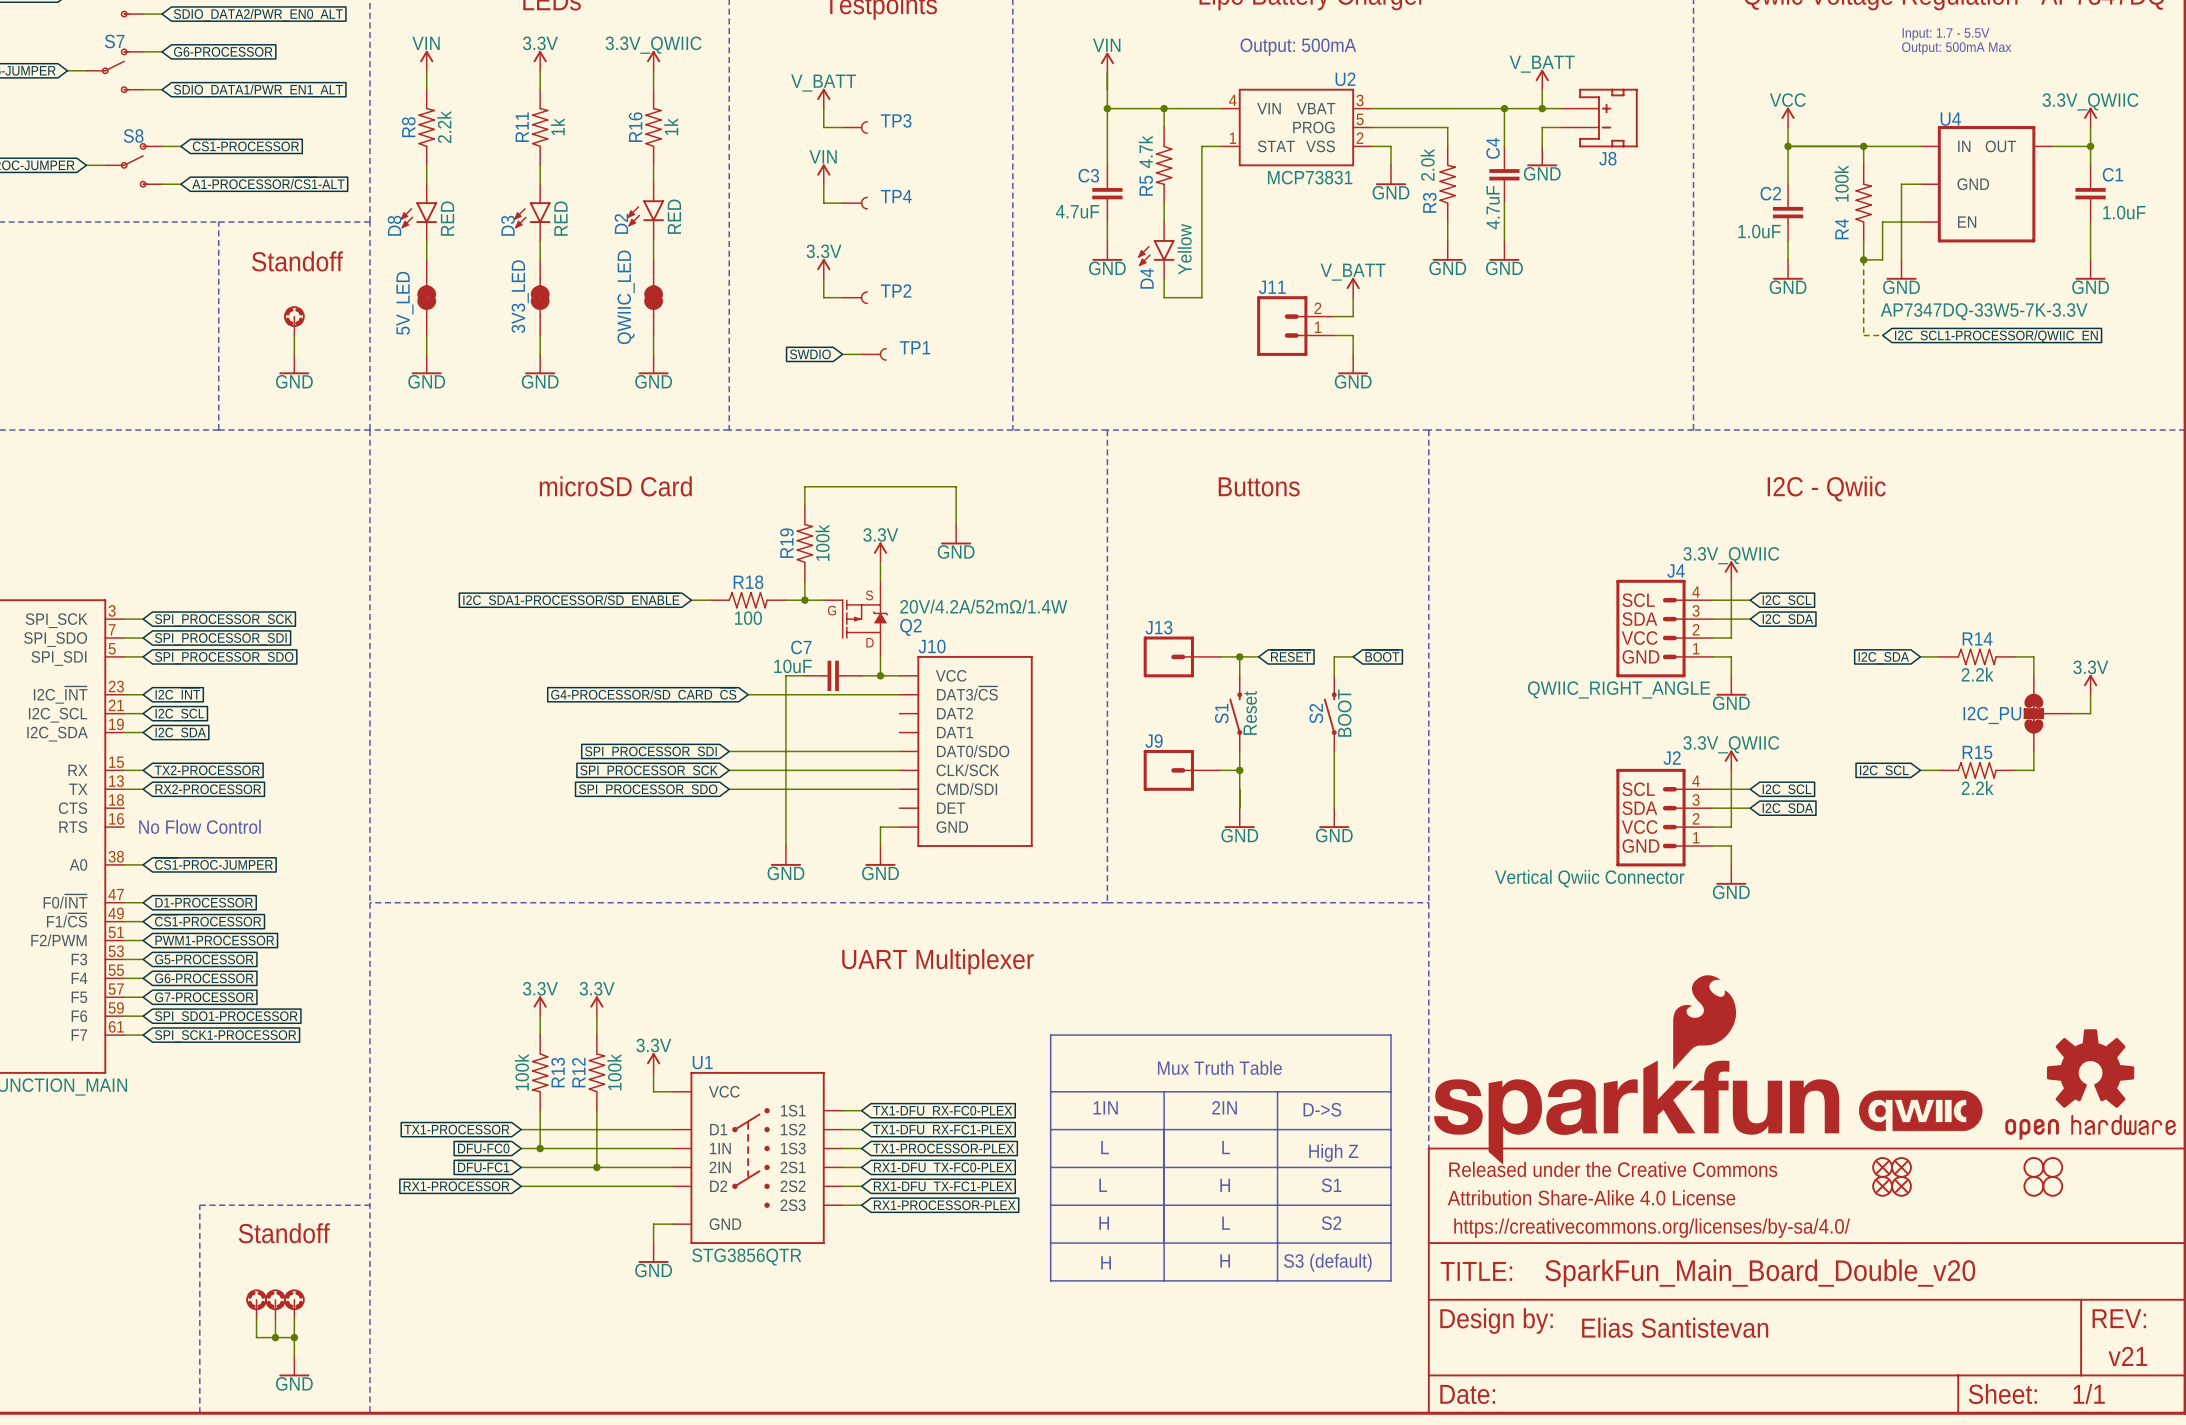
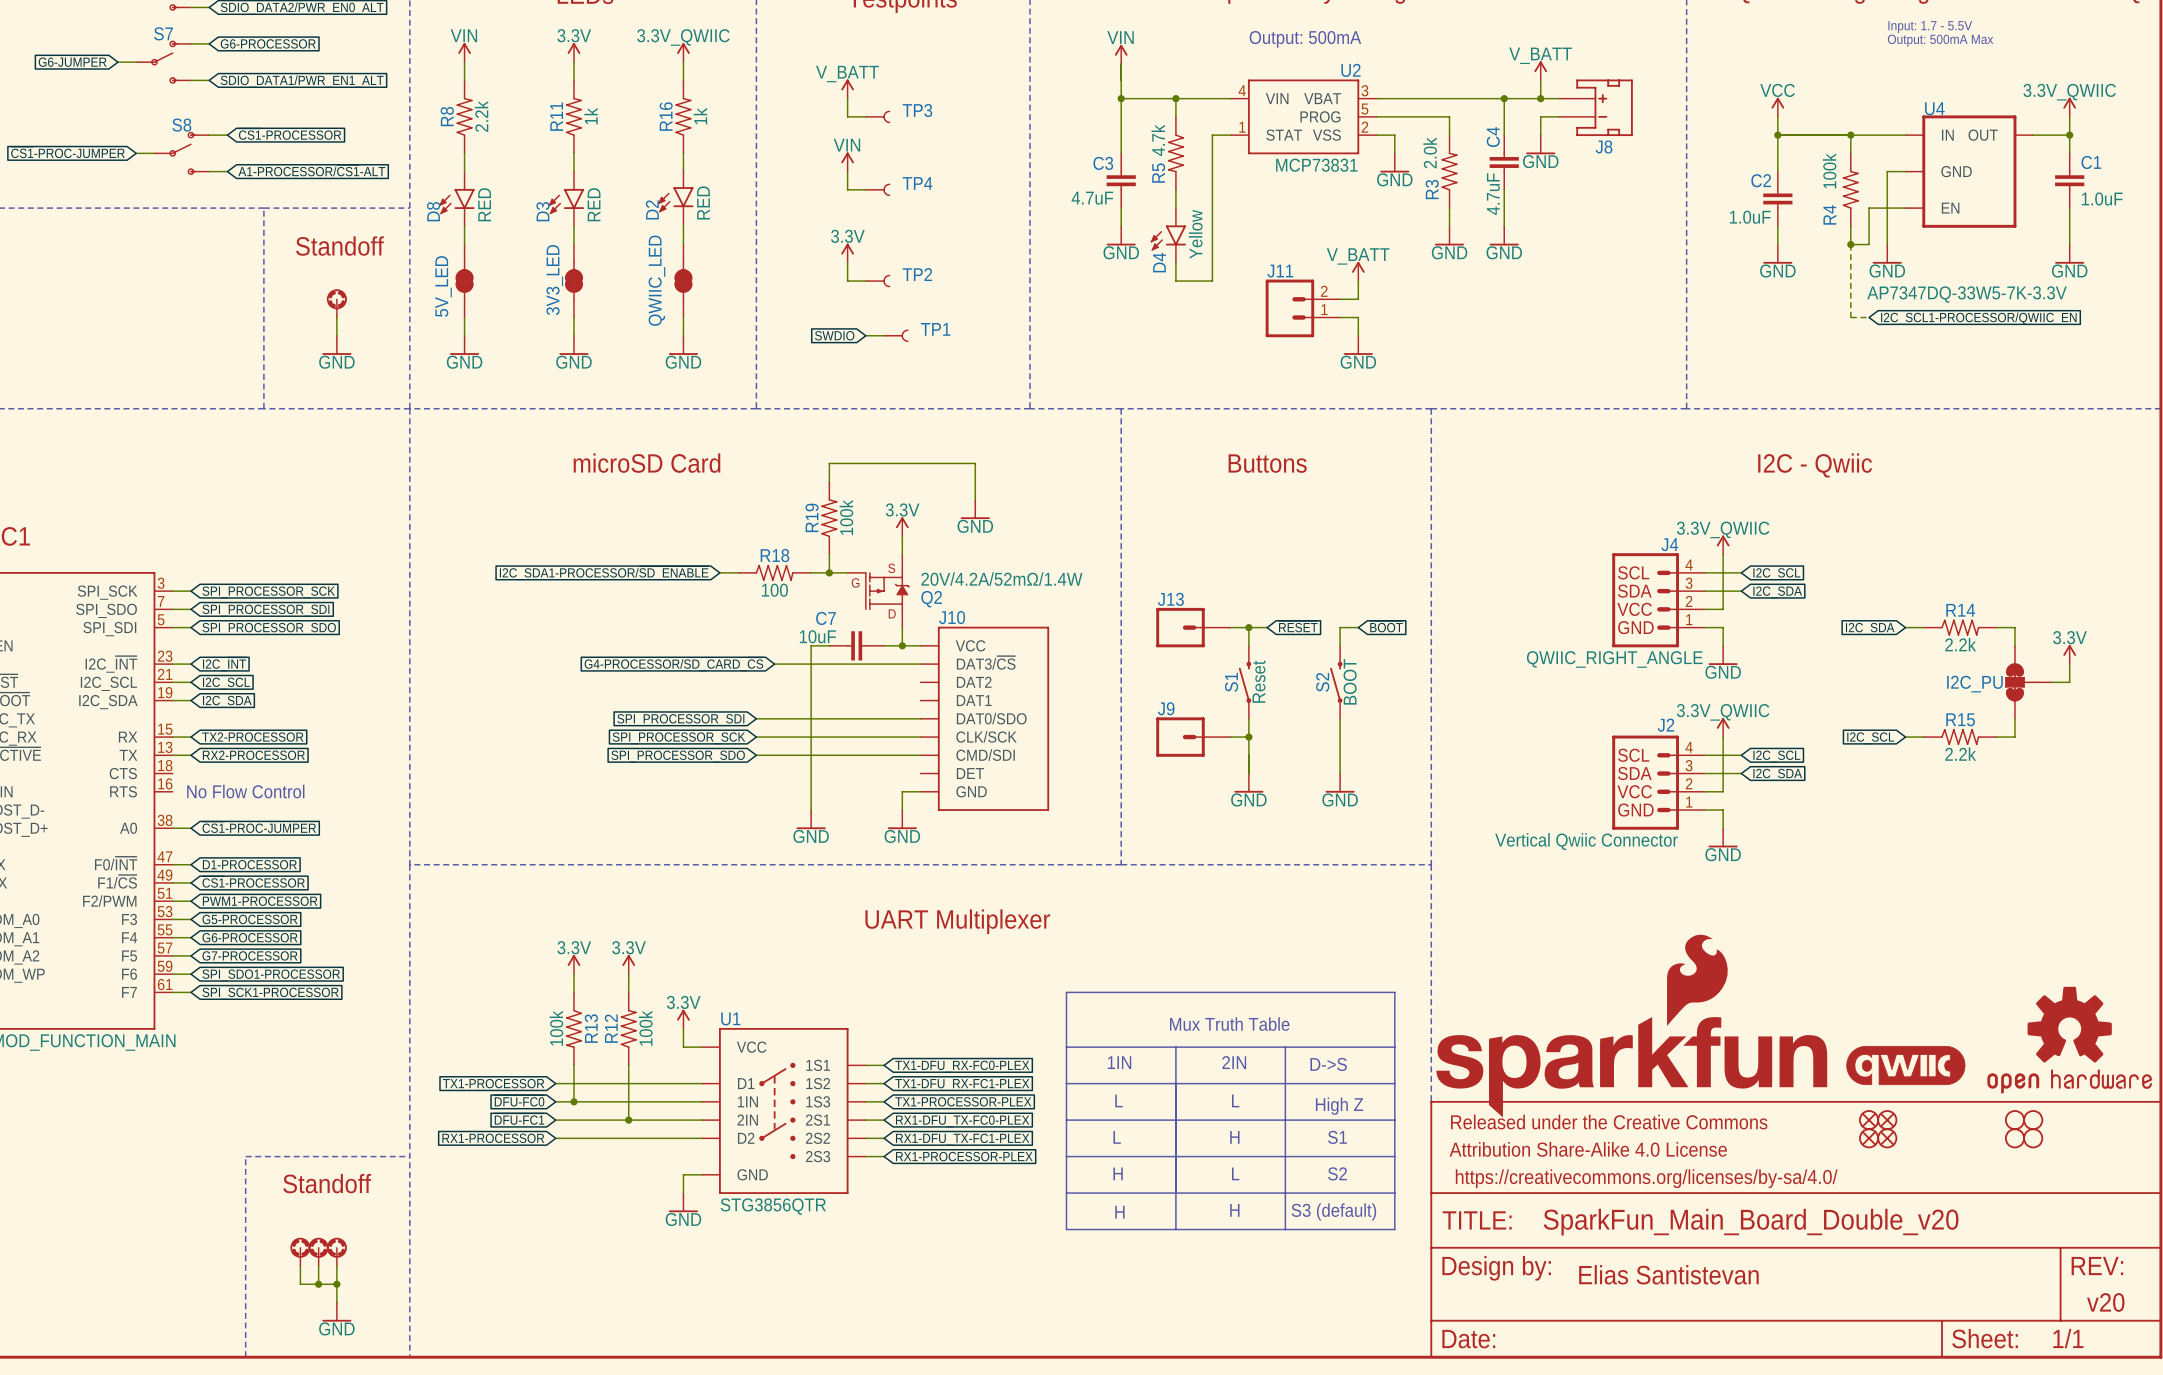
text: v21 (2127, 1356) -> v20 (2105, 1302)

